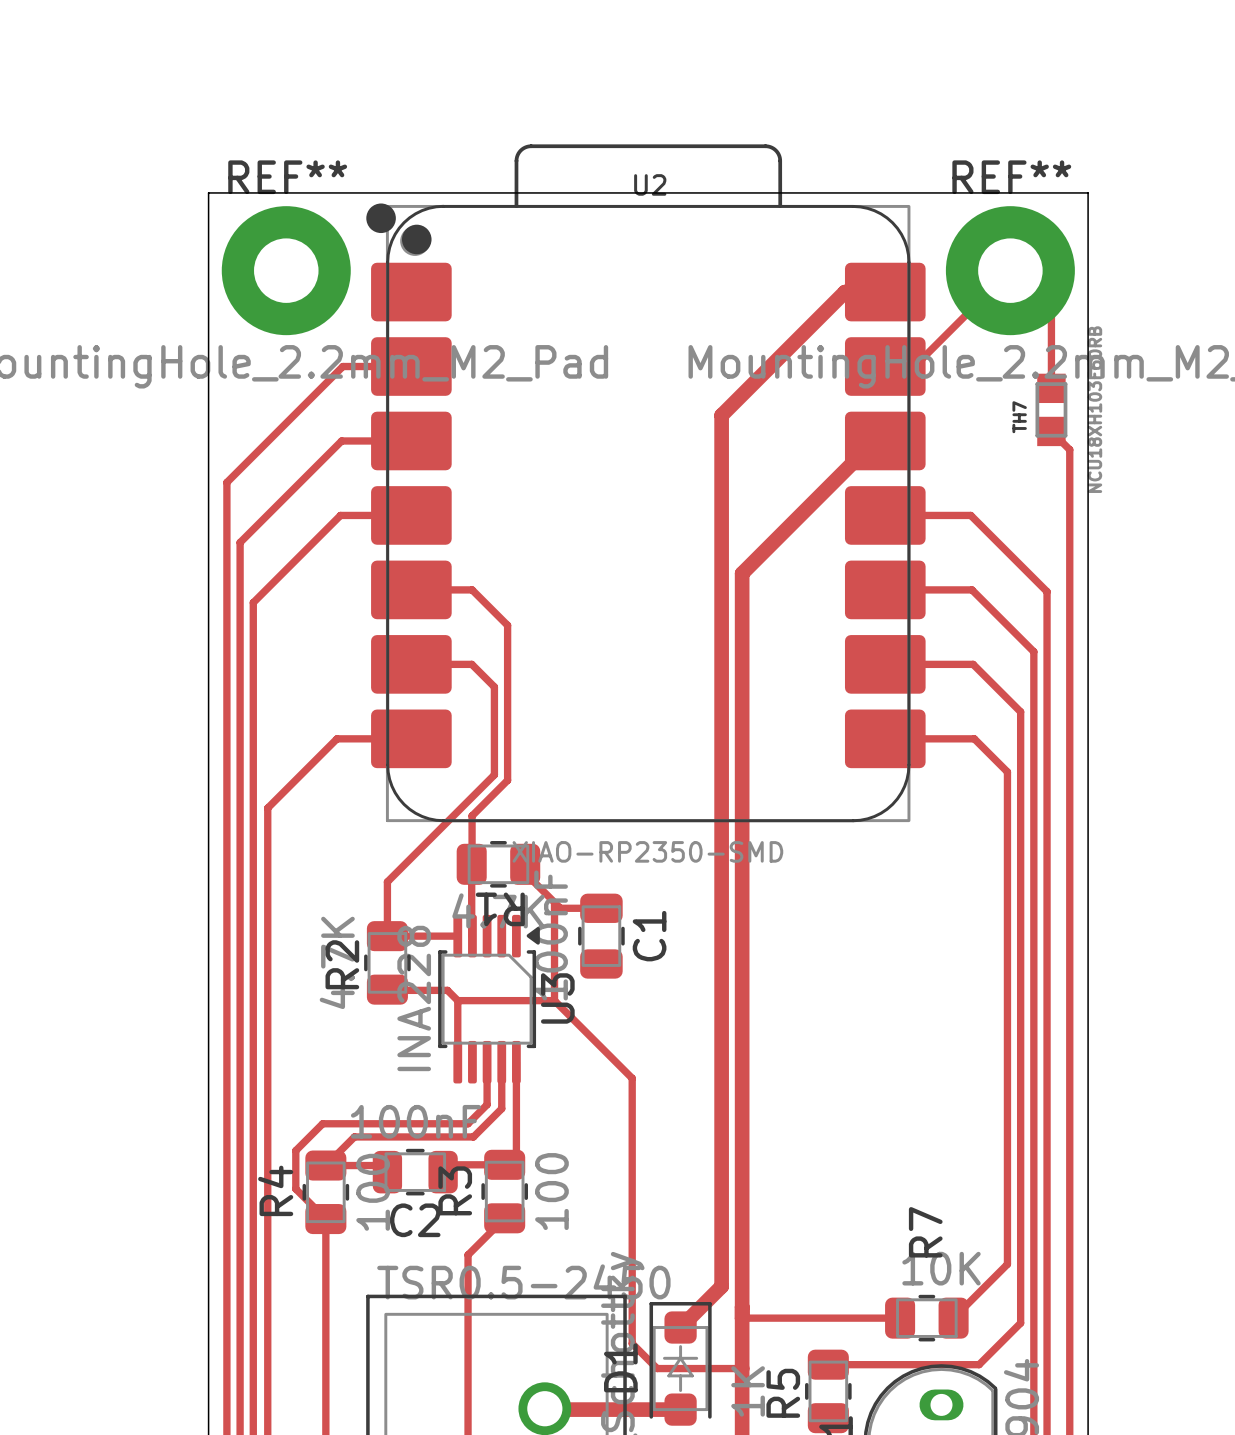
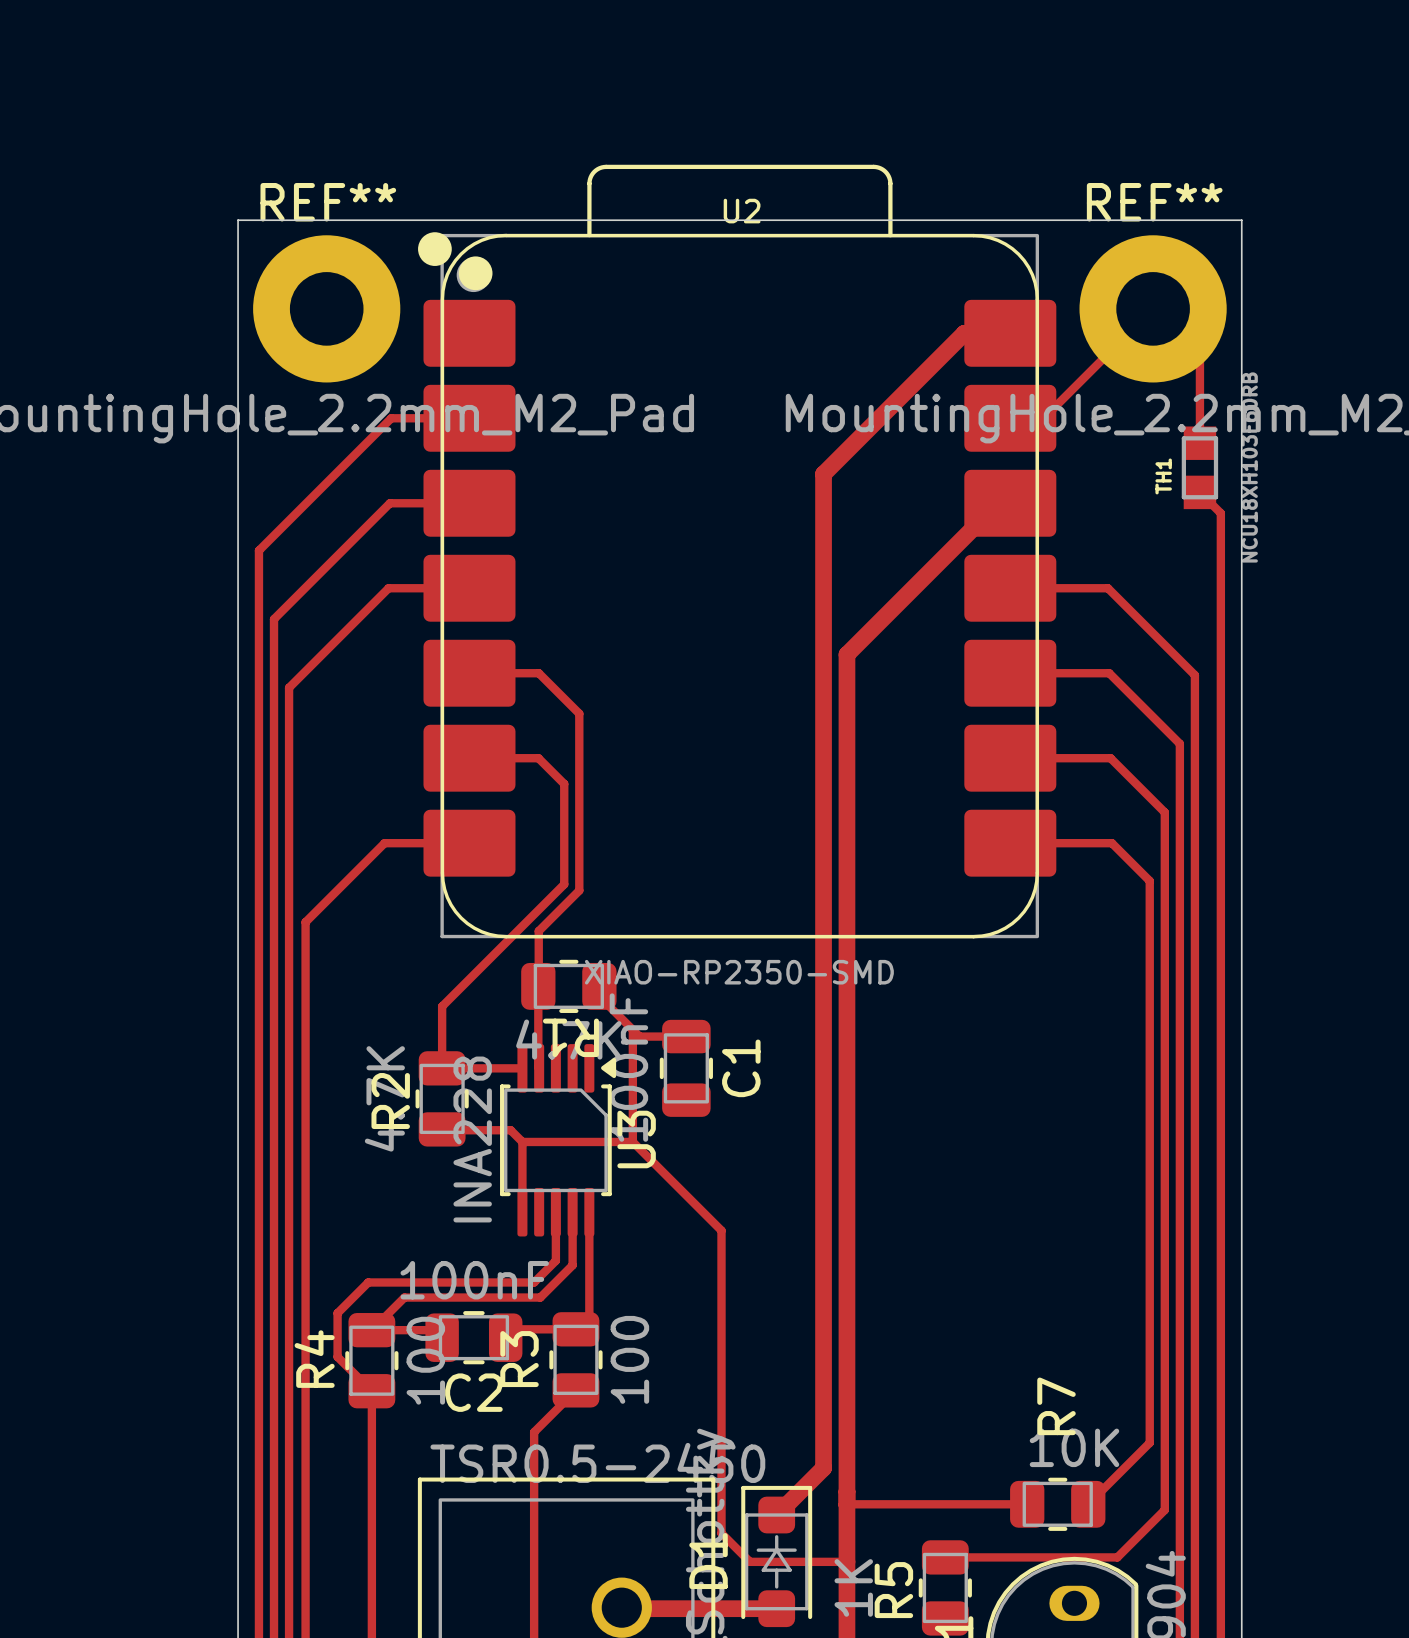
TH7 name: TH7 (1019, 417) -> TH1 (1163, 476)

